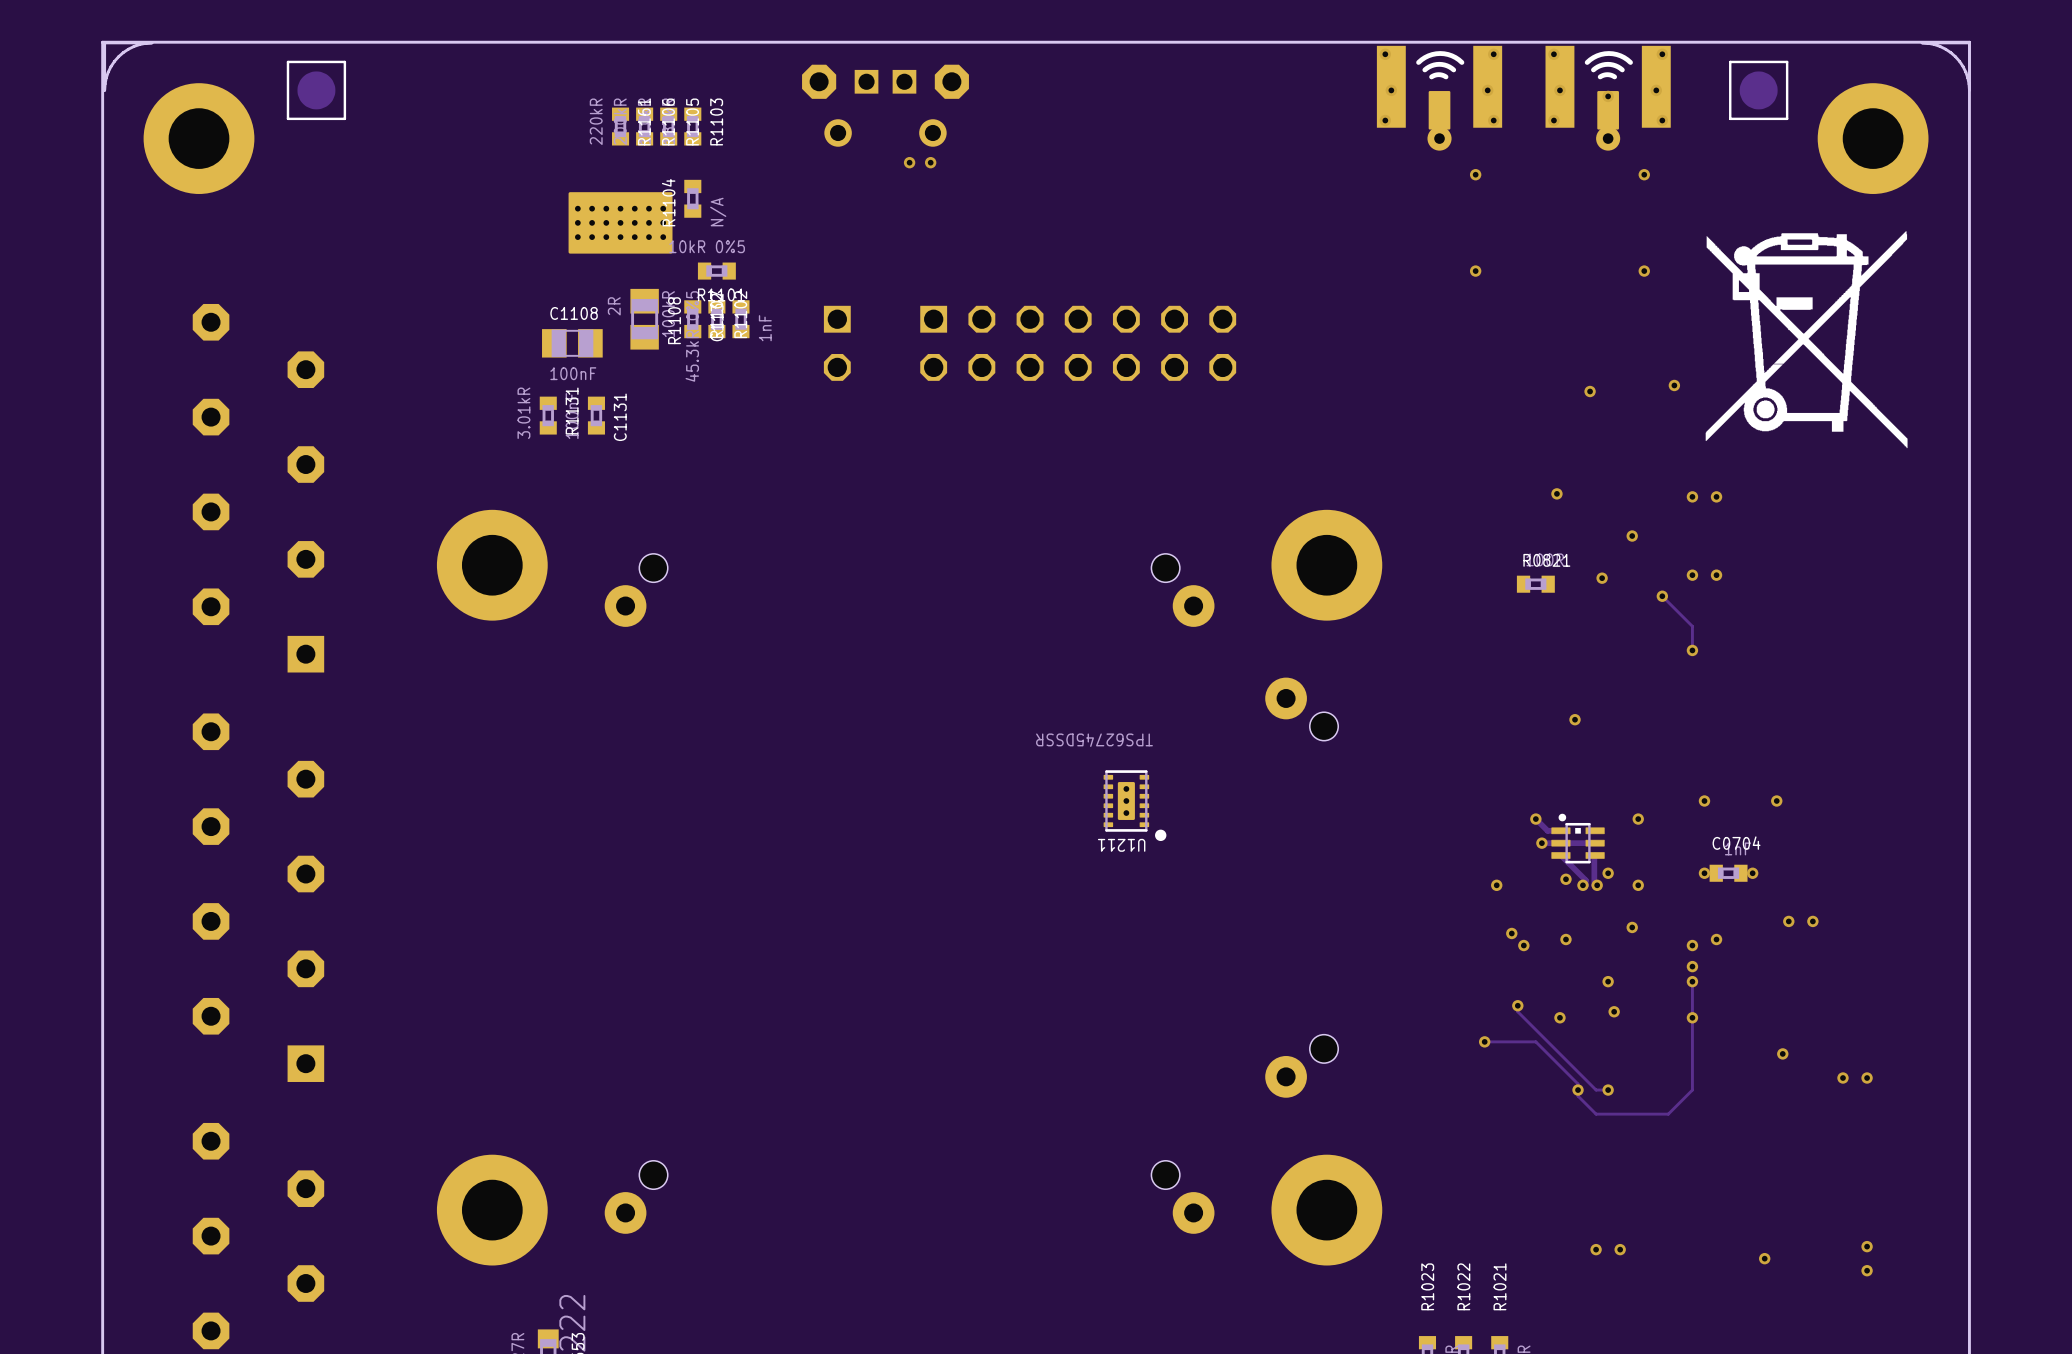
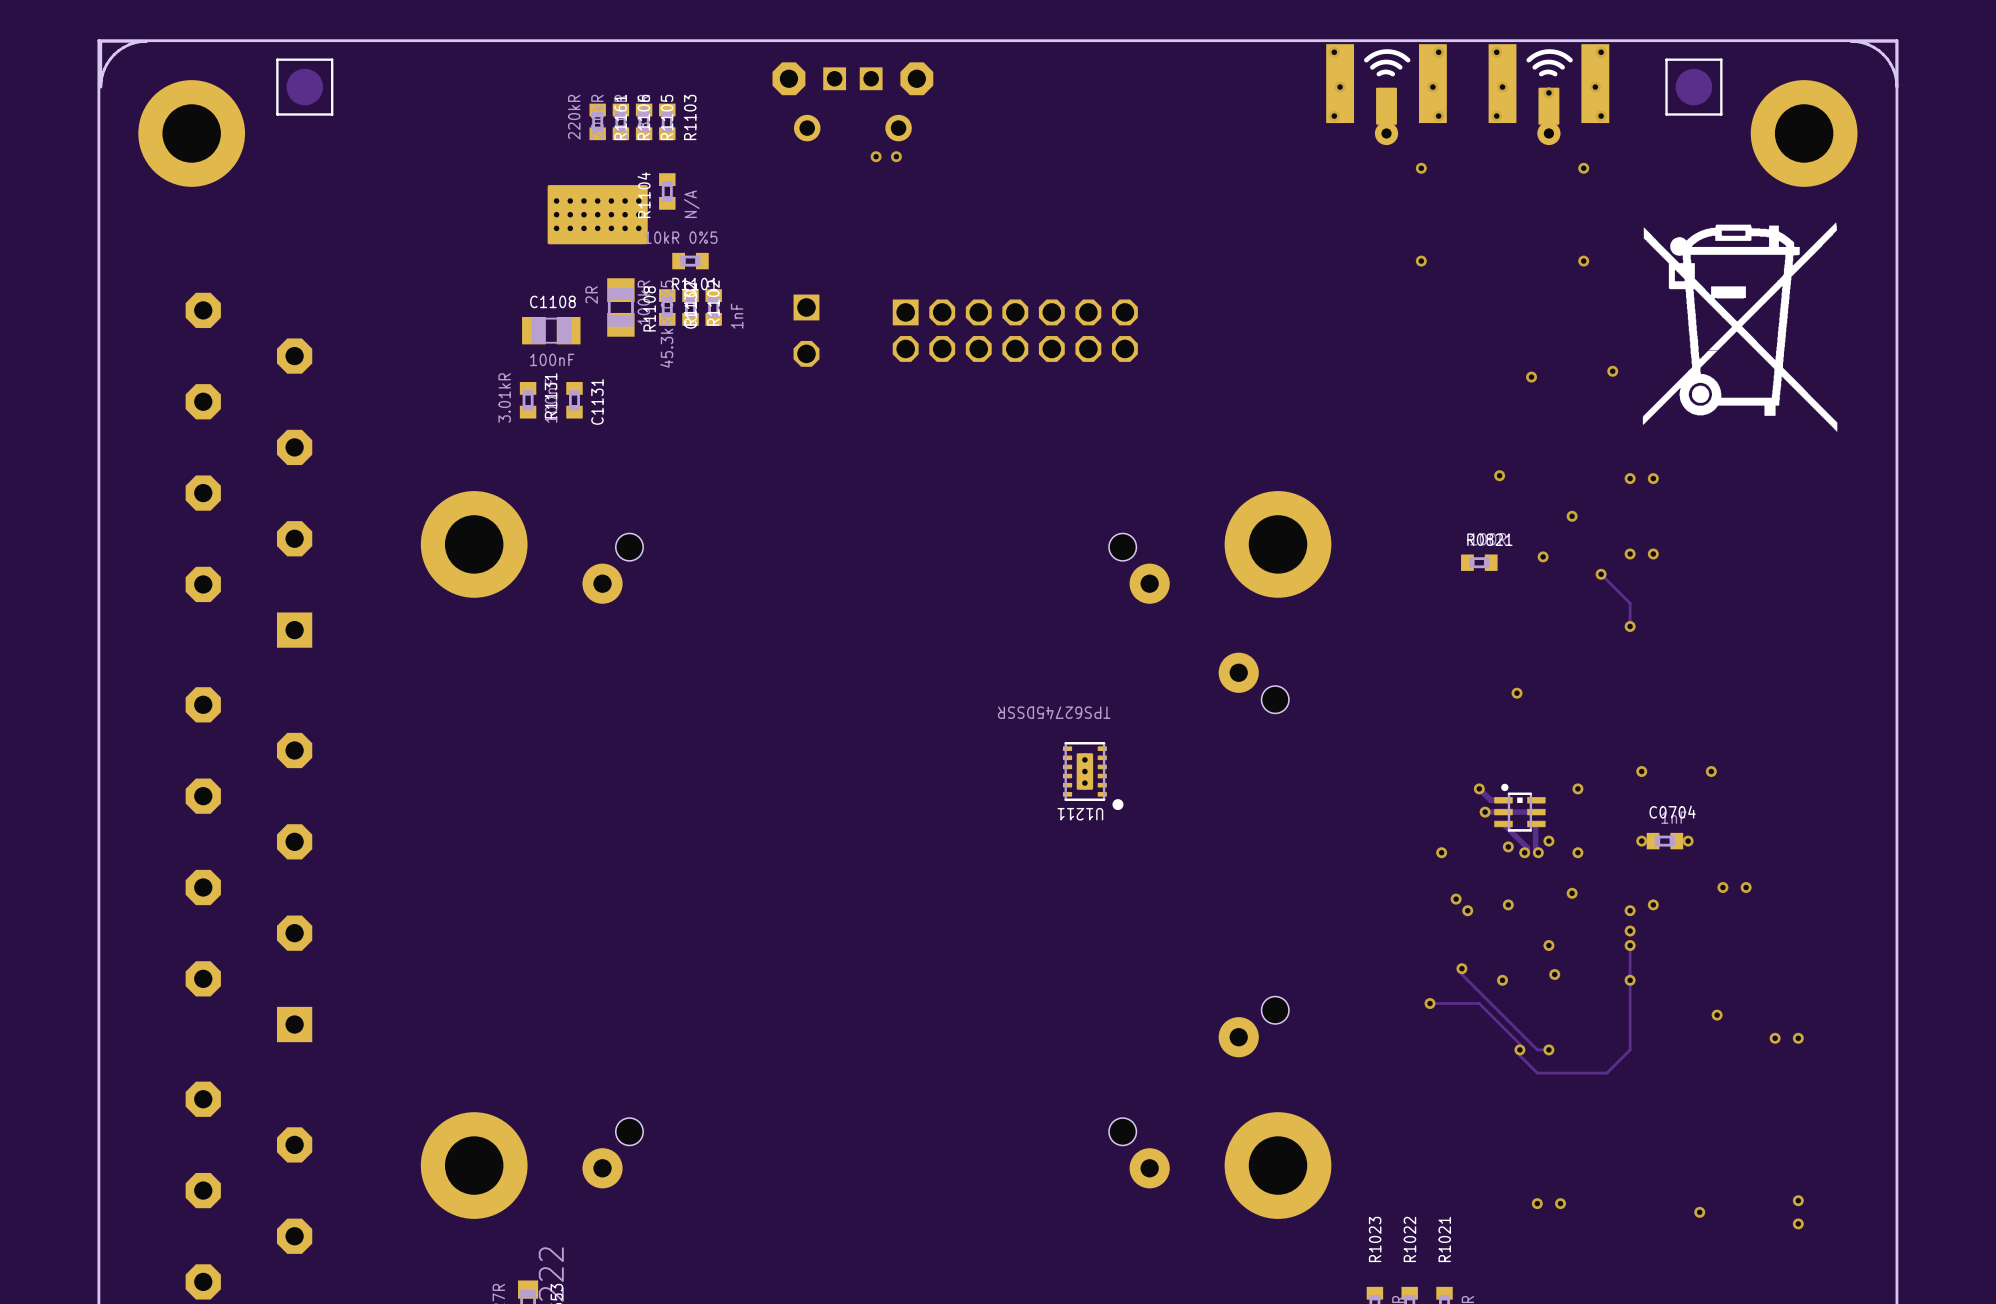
part: none -> (1015, 330)
part: (1078, 343) -> none

